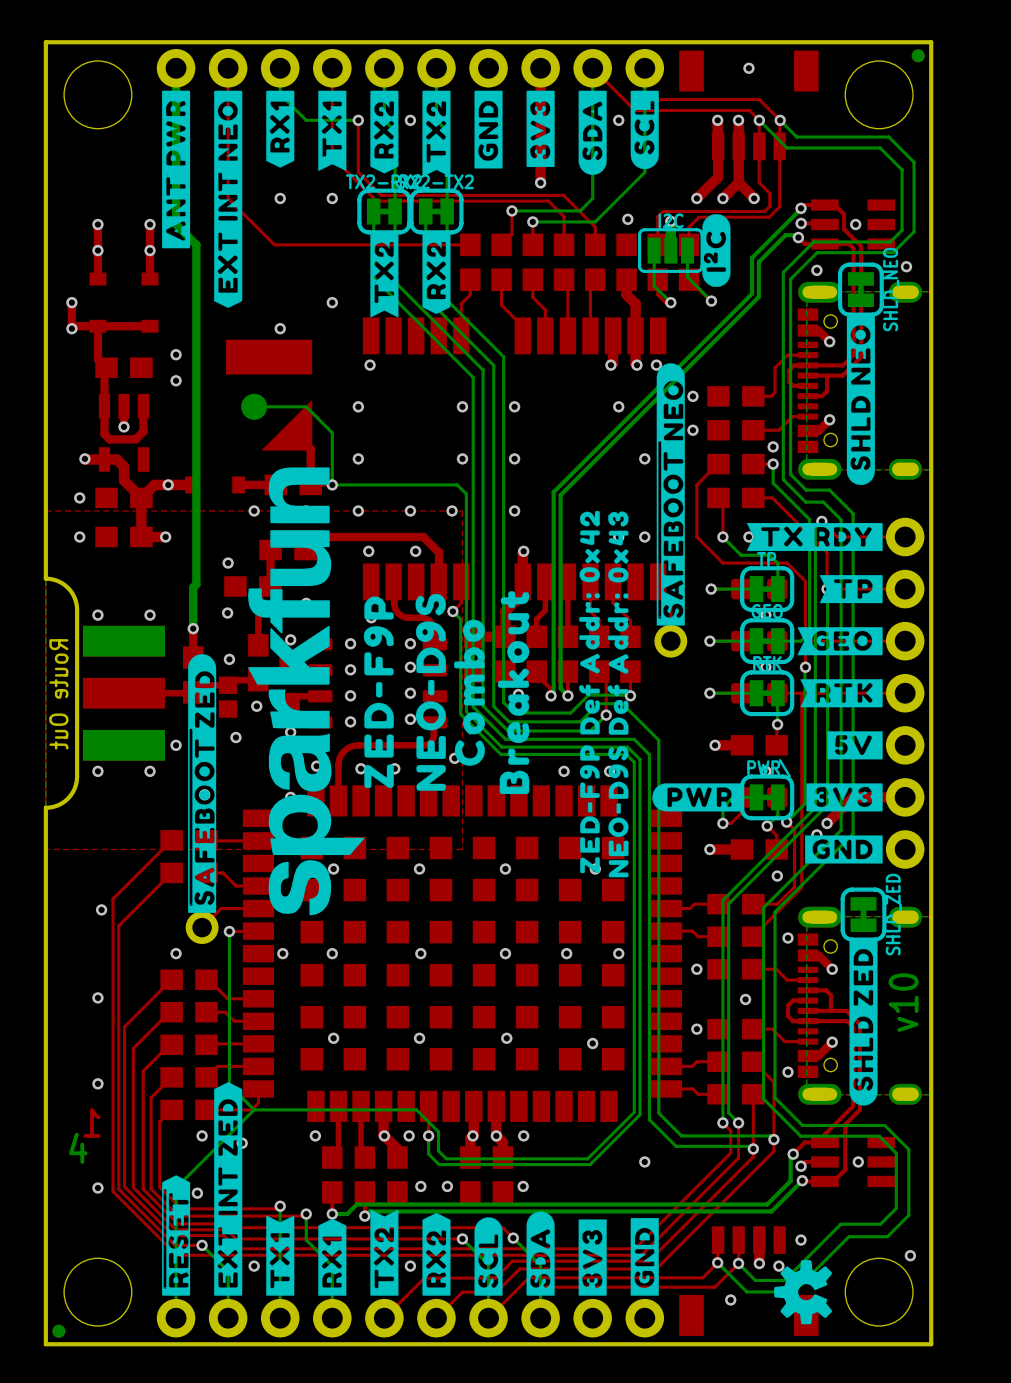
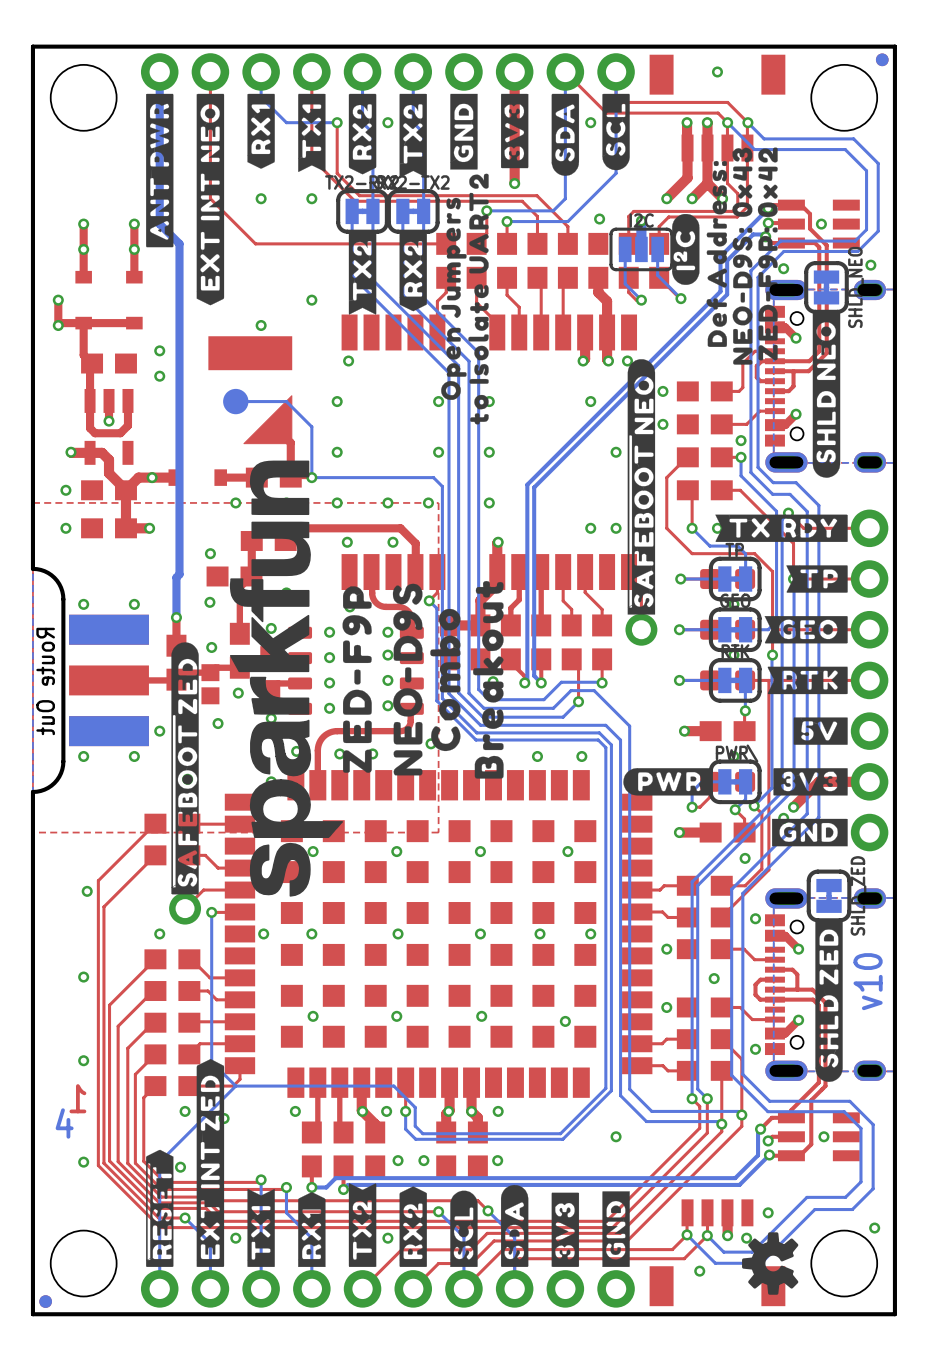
drawing: none -> [706, 147, 778, 365]
drawing: none -> [441, 173, 489, 425]
drawing: [578, 510, 629, 878] -> none

